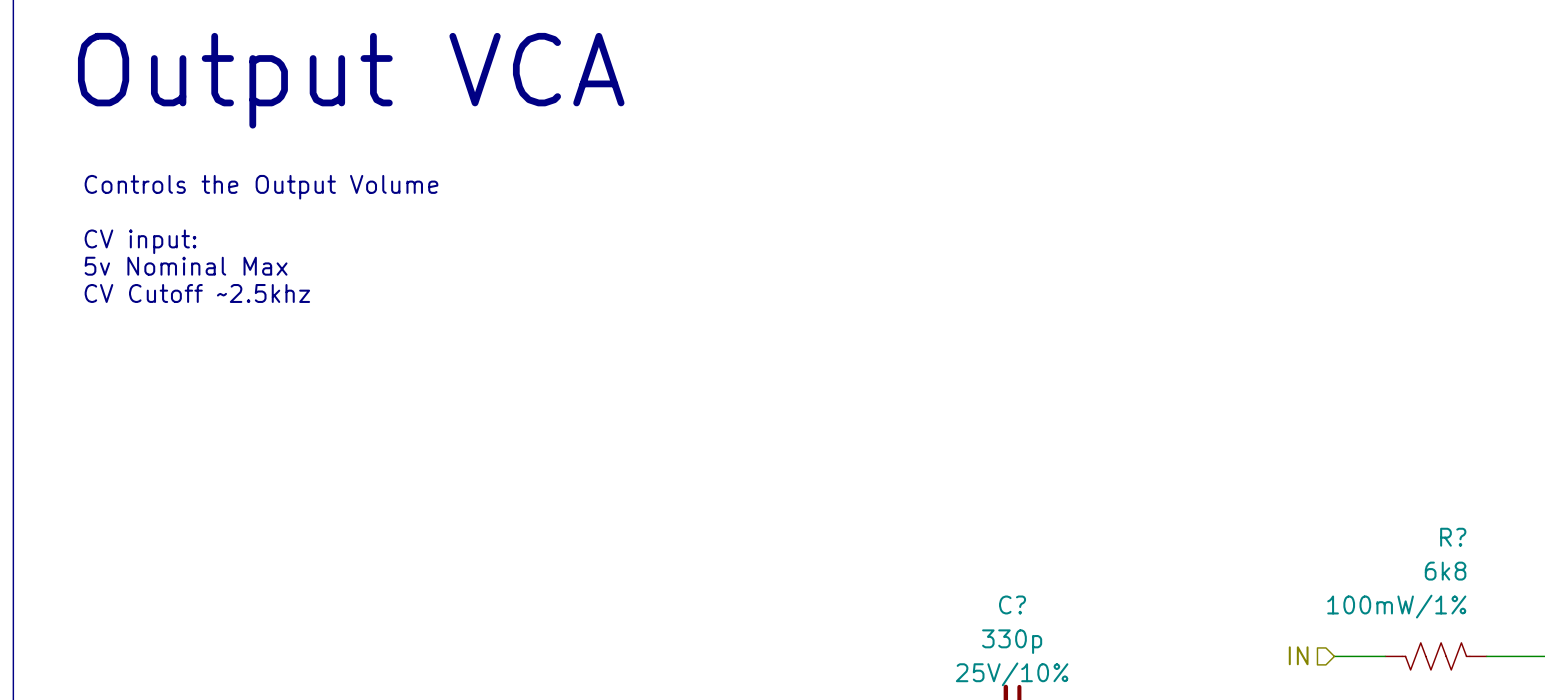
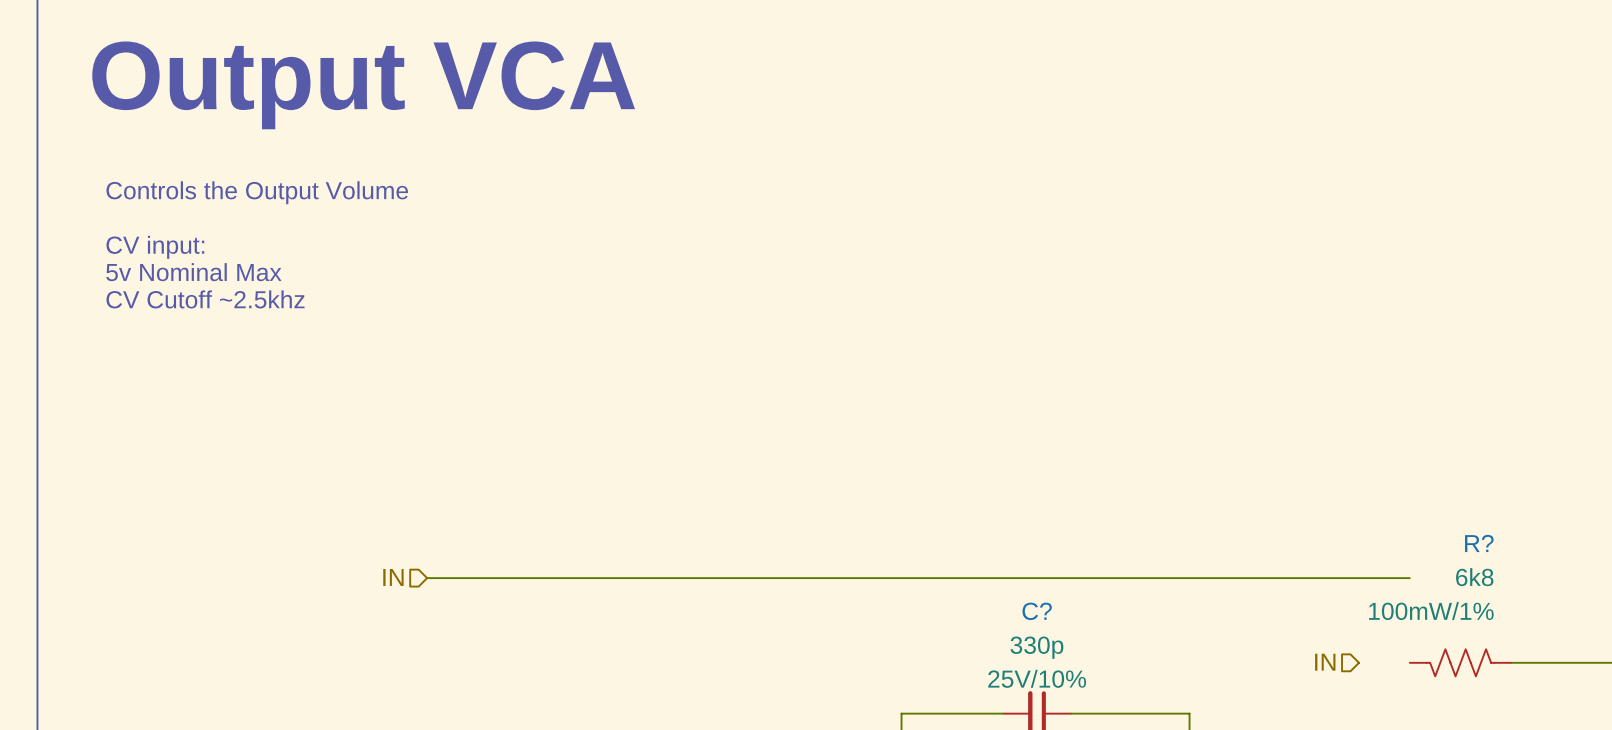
hierarchical label: none -> IN (393, 577)
wire: none -> (427, 578) (1409, 578)
wire: (1334, 656) (1385, 656) -> none

